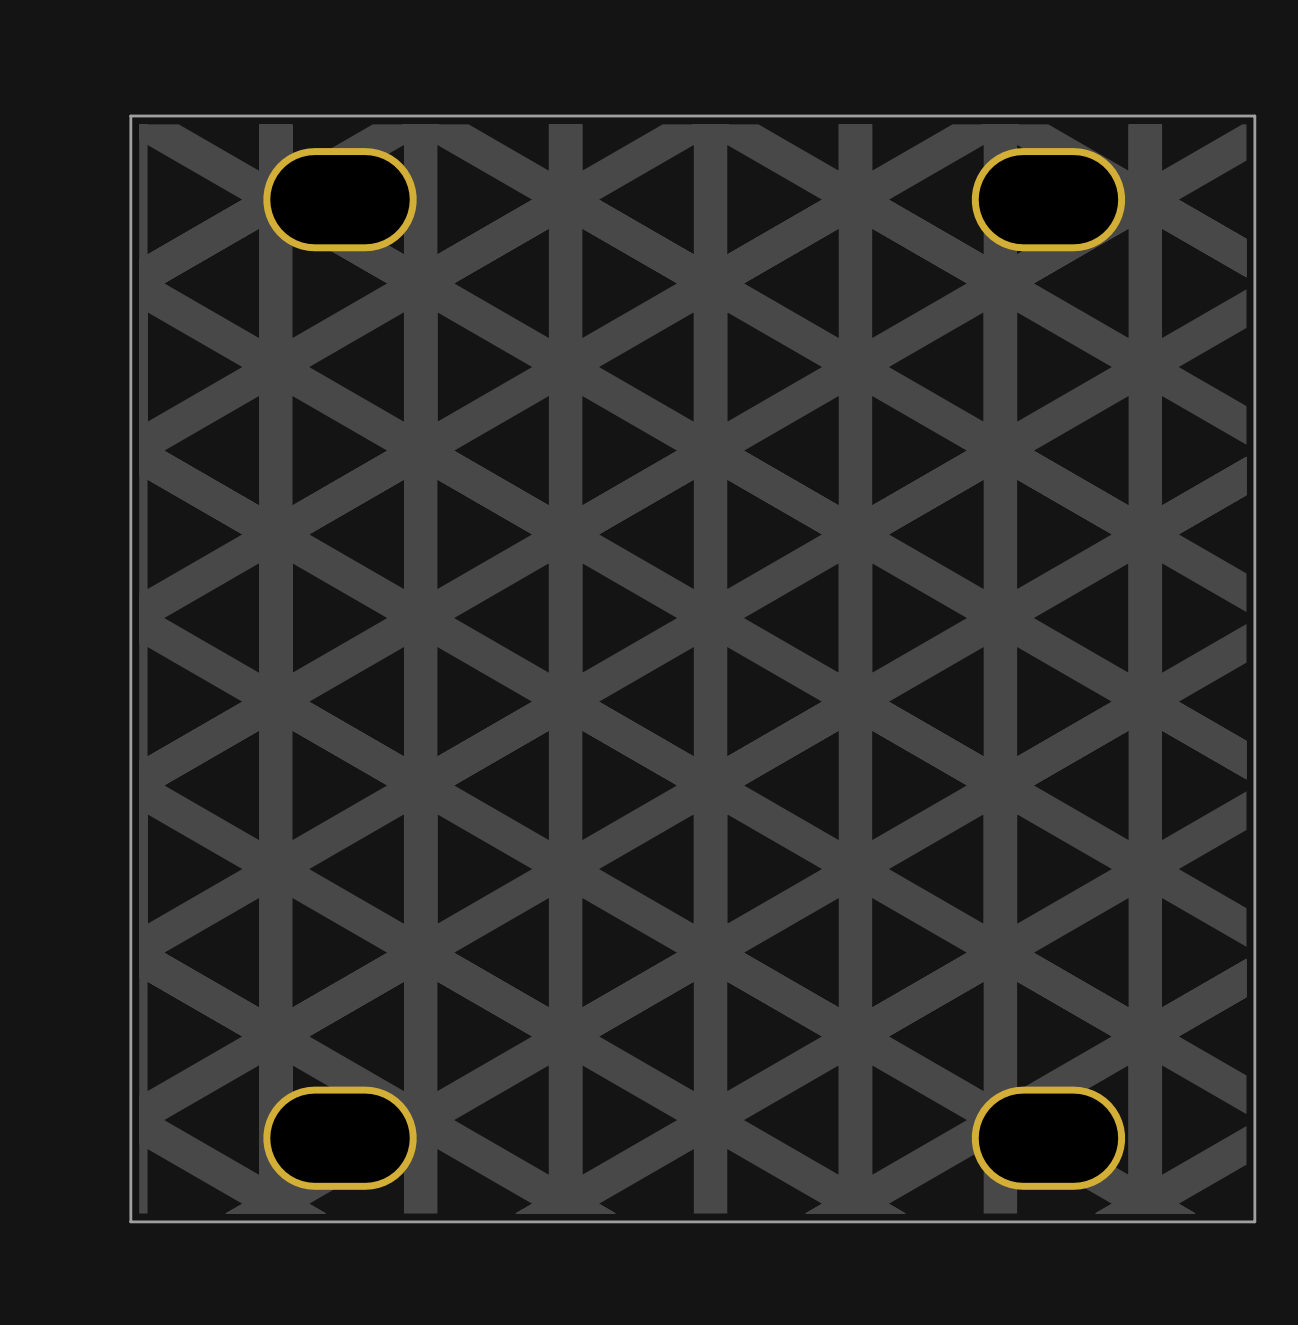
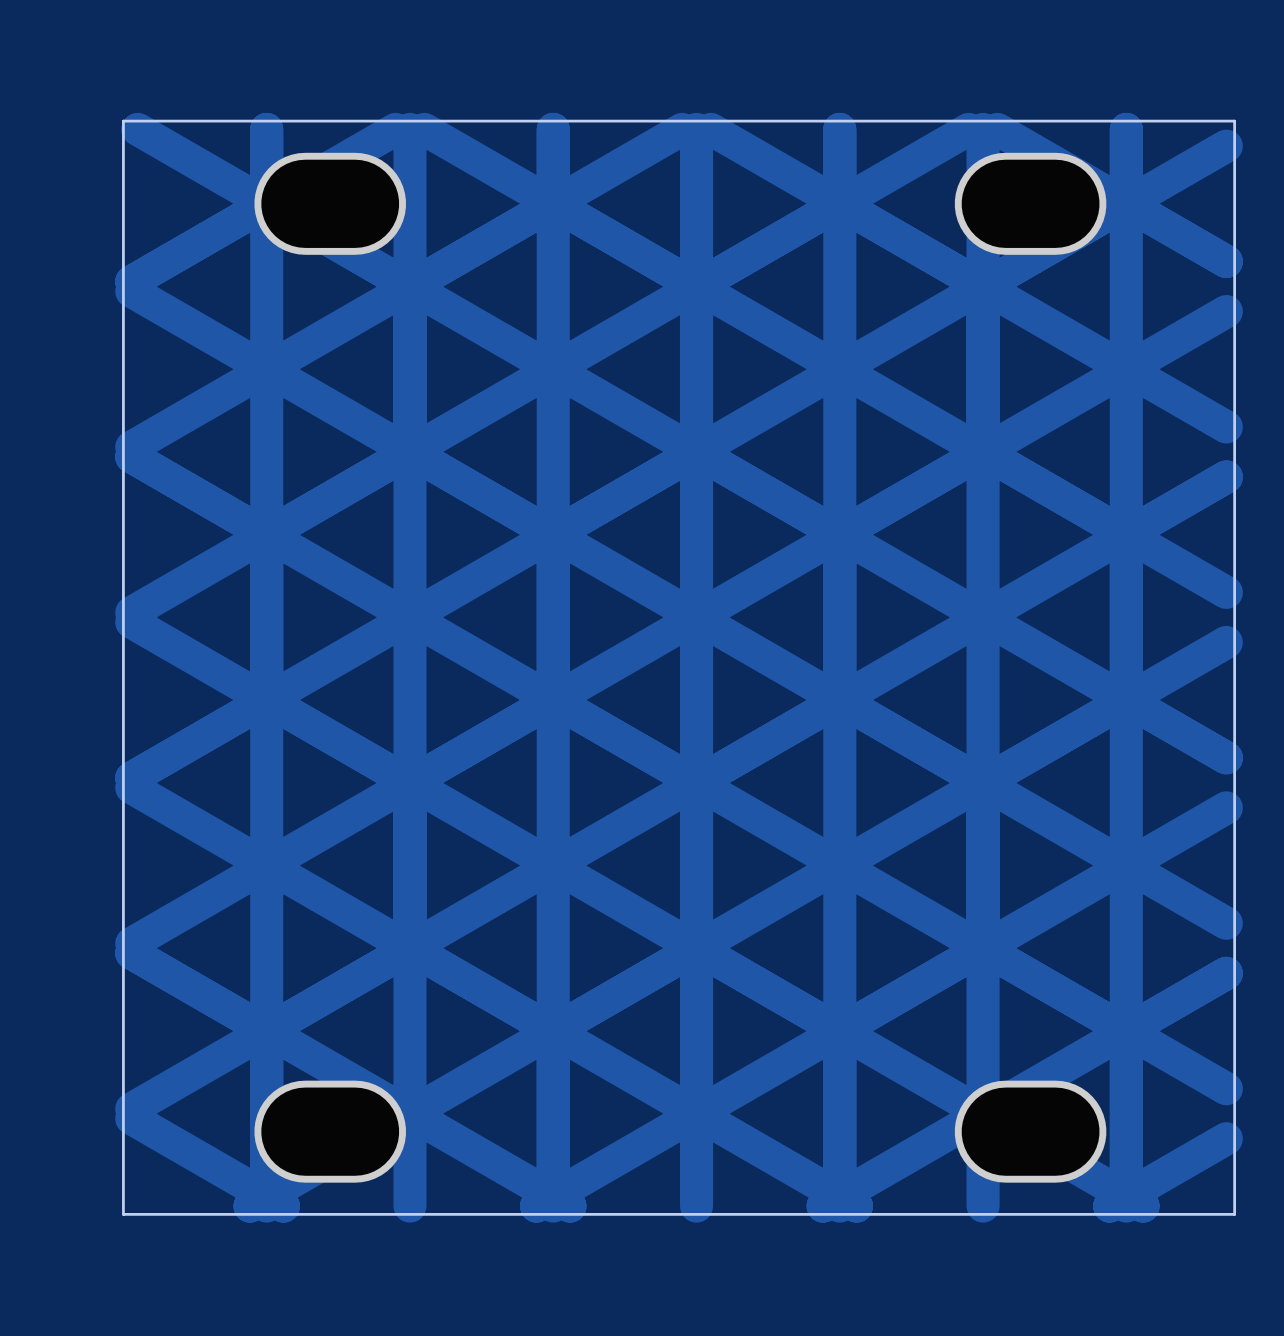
drawing: [139, 124, 1247, 1214] -> none
track: none -> (137, 129) (1226, 757)
track: none -> (266, 129) (266, 1206)
track: none -> (395, 129) (131, 281)
track: none -> (409, 129) (409, 1206)
track: none -> (424, 129) (1226, 592)
track: none -> (553, 129) (553, 1206)
track: none -> (682, 129) (131, 447)
track: none -> (696, 129) (696, 1206)
track: none -> (710, 129) (1226, 427)
track: none -> (839, 129) (839, 1206)
track: none -> (968, 129) (131, 612)
track: none -> (983, 129) (983, 1206)
track: none -> (997, 129) (1226, 261)
track: none -> (1126, 129) (1126, 1206)
track: none -> (1226, 146) (131, 778)
track: none -> (131, 291) (1226, 923)
track: none -> (1226, 311) (131, 943)
track: none -> (131, 456) (1226, 1088)
track: none -> (1226, 476) (131, 1108)
track: none -> (131, 622) (1143, 1206)
track: none -> (1226, 642) (249, 1206)
track: none -> (131, 787) (856, 1206)
track: none -> (1226, 807) (536, 1206)
track: none -> (131, 953) (569, 1206)
track: none -> (1226, 973) (823, 1206)
track: none -> (131, 1118) (283, 1206)
track: none -> (1226, 1138) (1109, 1206)

